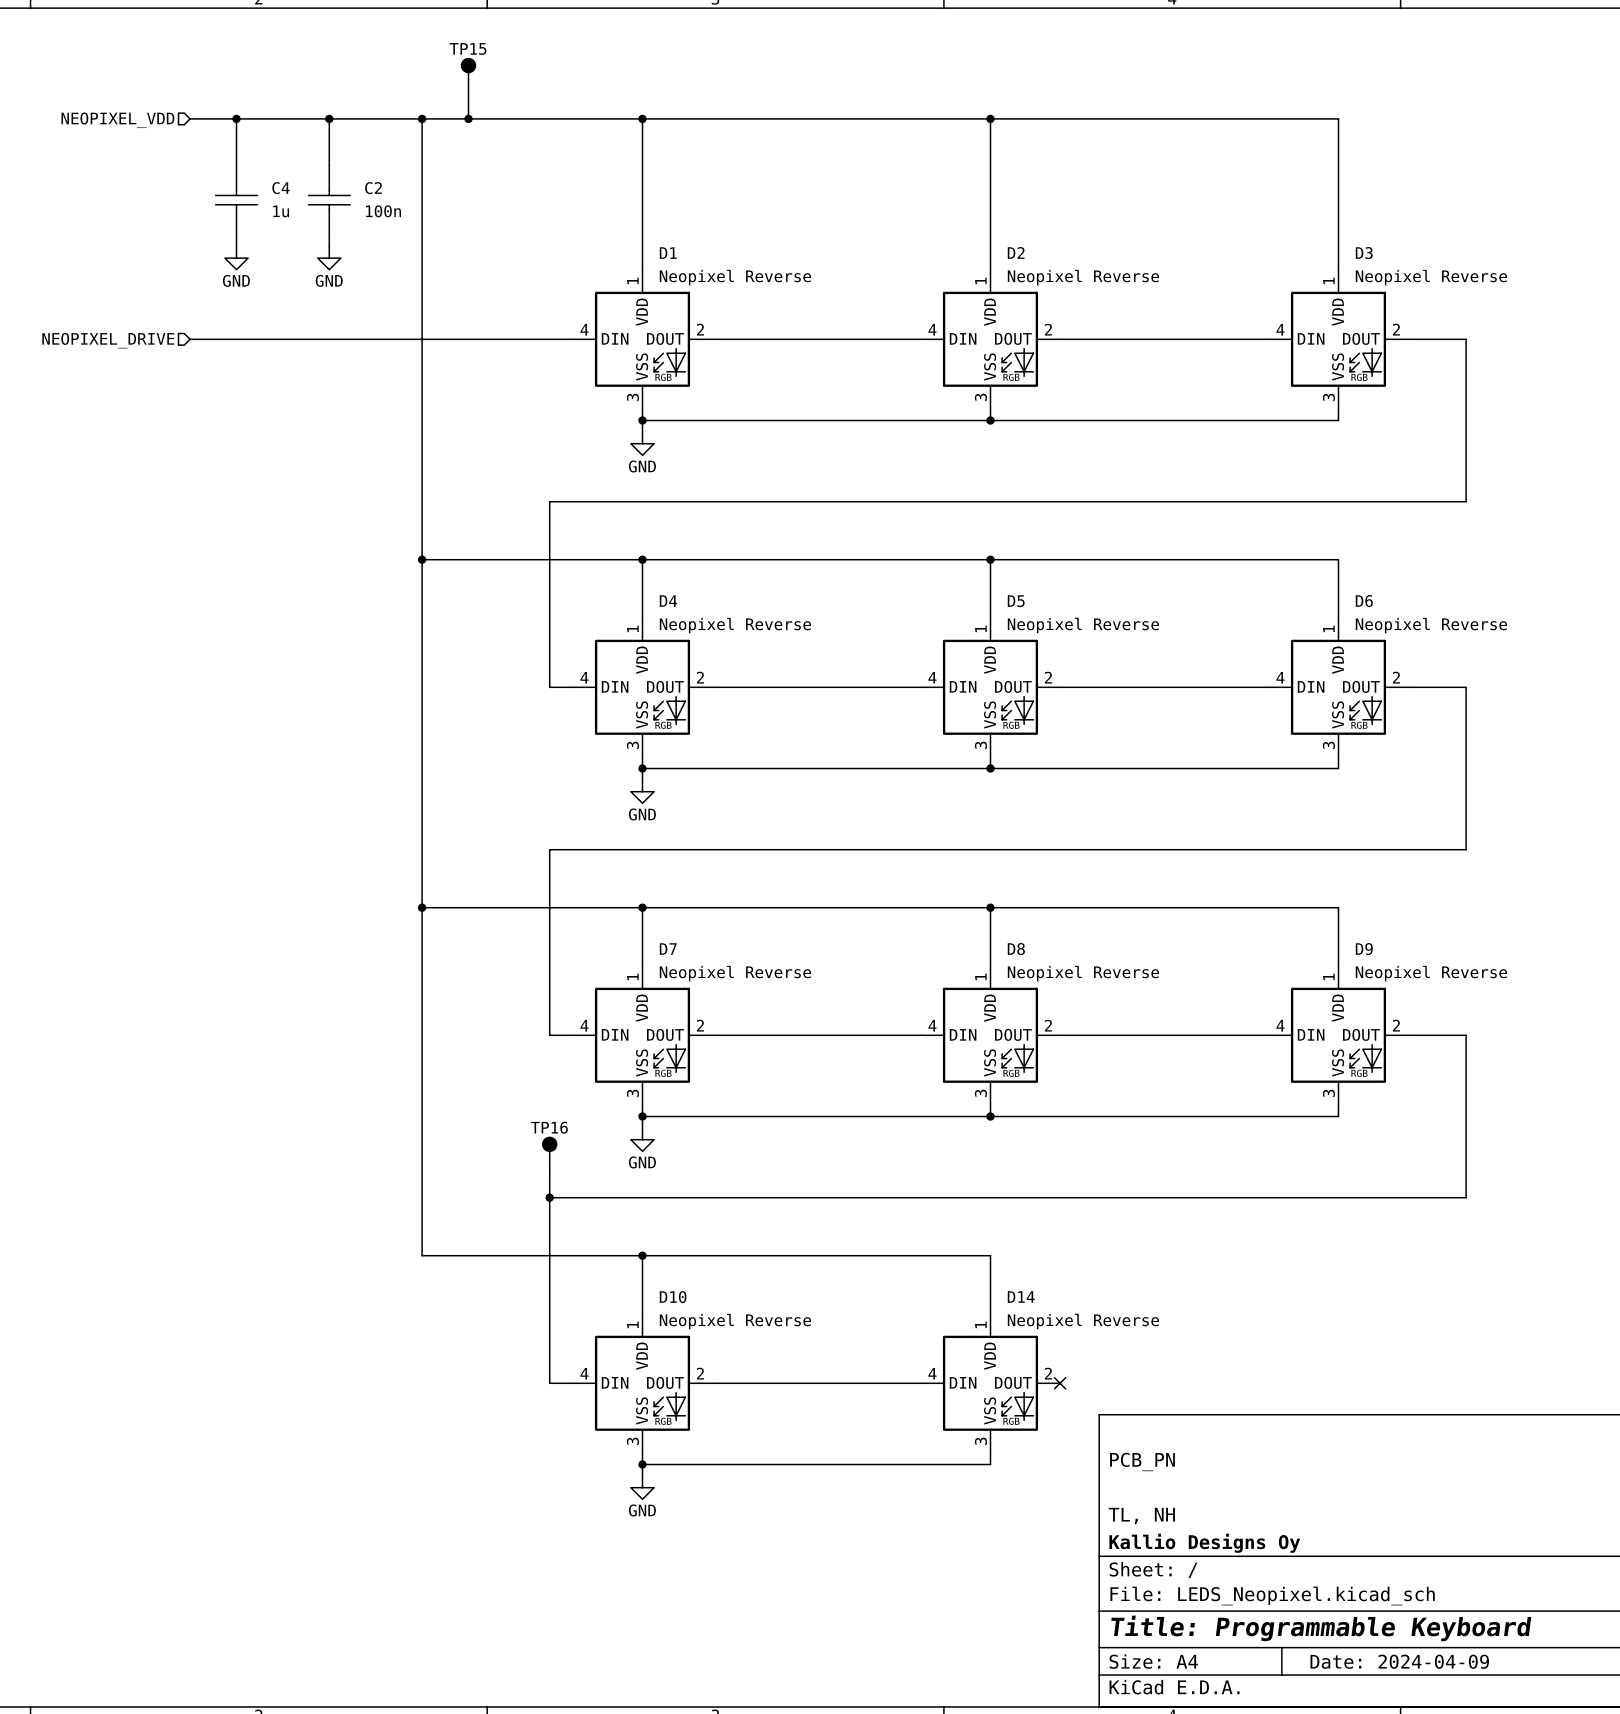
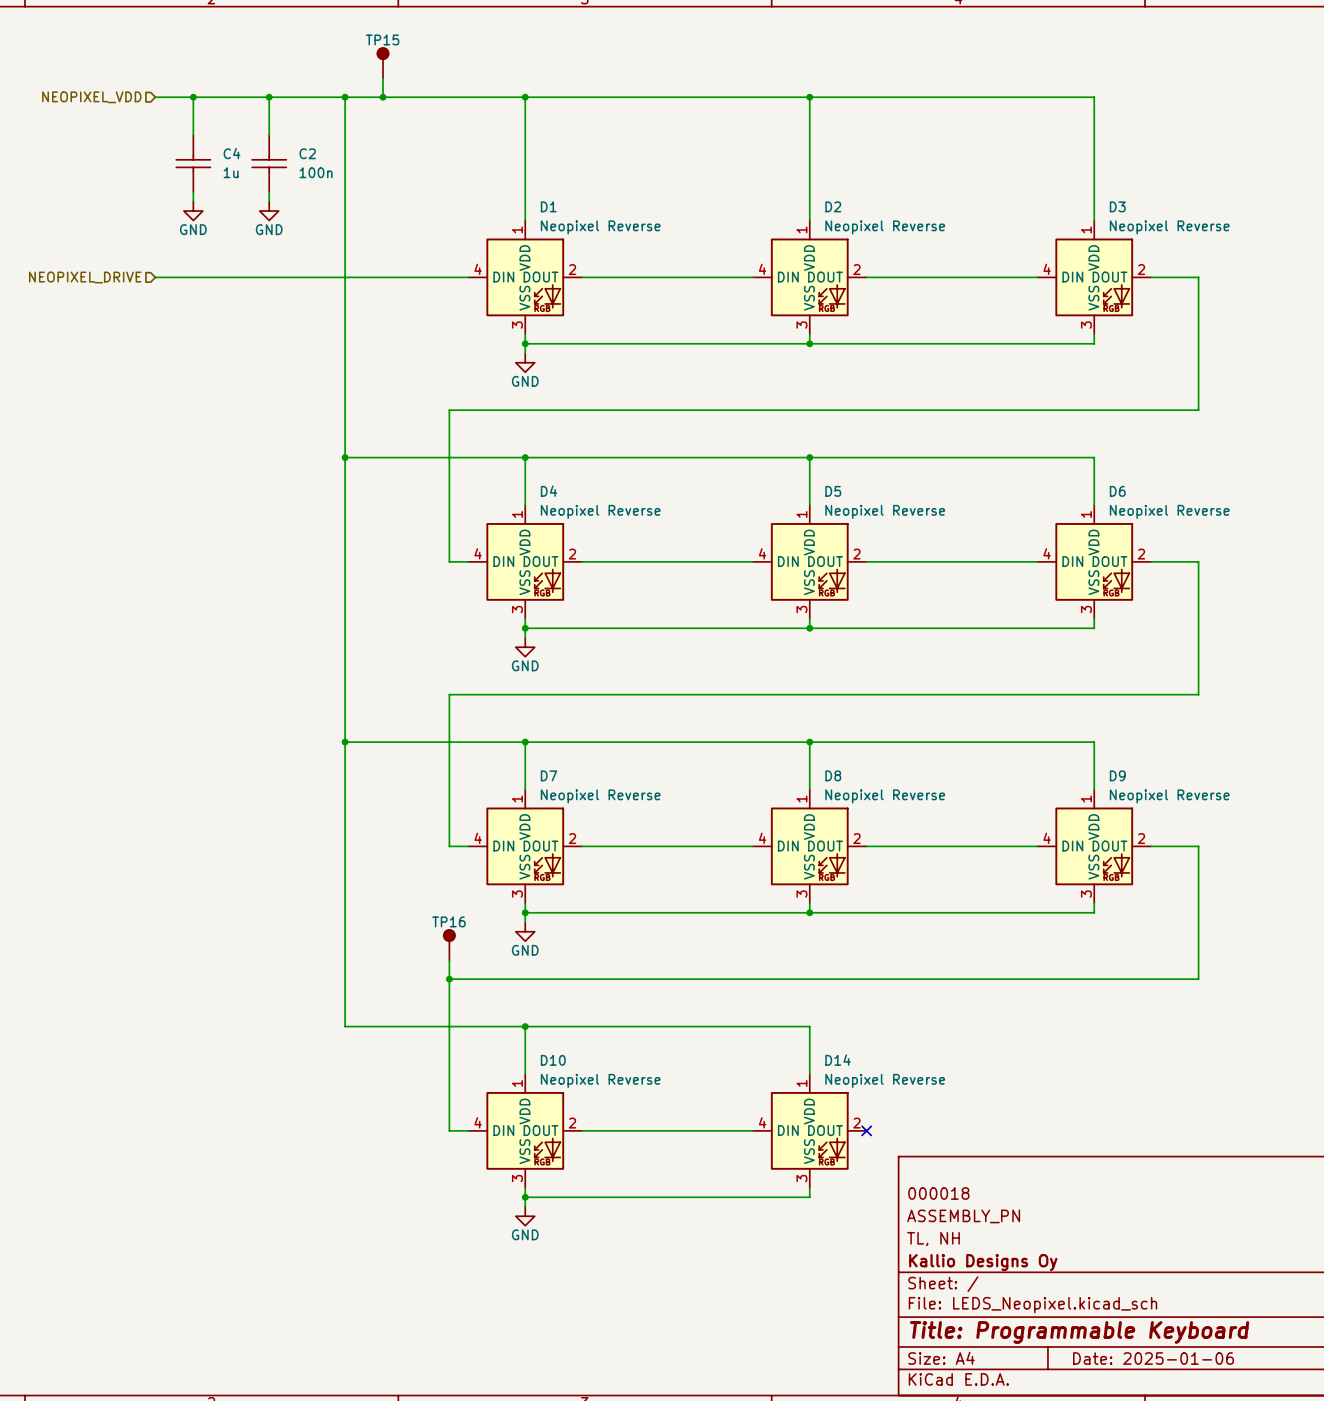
title block: PCB_PN (1142, 1461) -> 000018 (938, 1193)
title block: none -> ASSEMBLY_PN (963, 1216)
title block: Date: 2024-04-09 (1399, 1661) -> Date: 2025-01-06 (1153, 1358)

